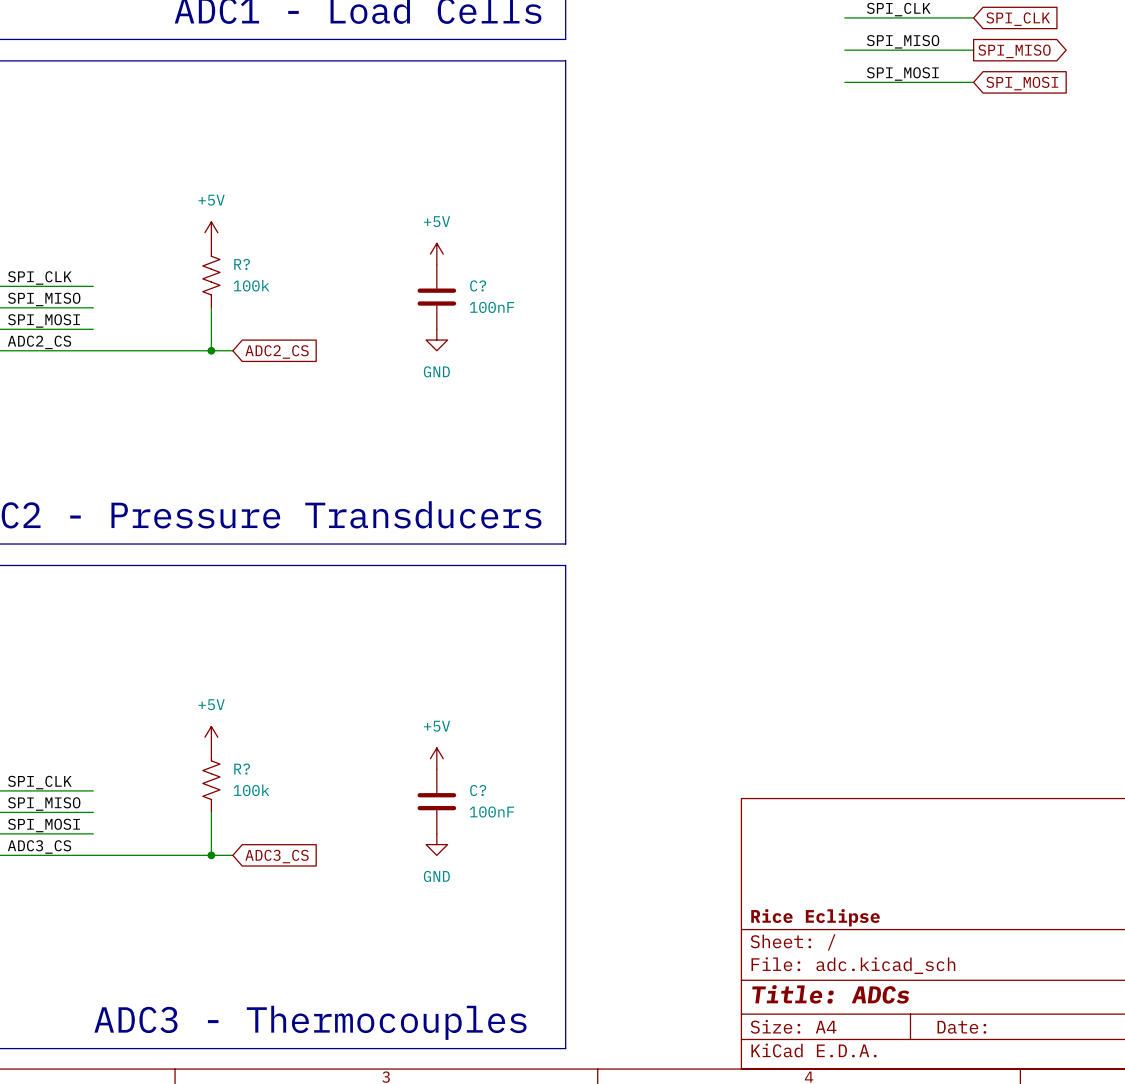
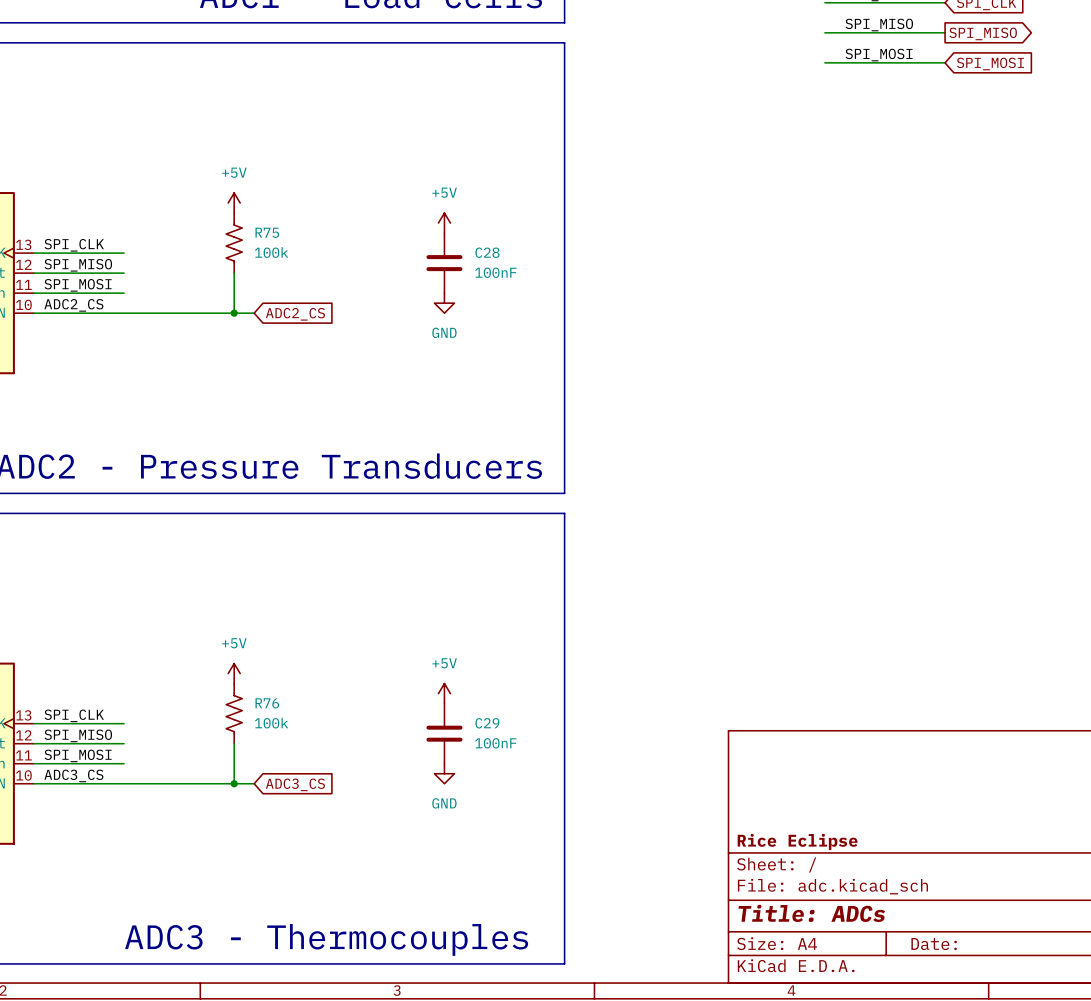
R? name: R? (242, 264) -> R75 (267, 232)
C? name: C? (478, 285) -> C28 (487, 252)
R? name: R? (242, 769) -> R76 (267, 703)
C? name: C? (478, 790) -> C29 (487, 723)

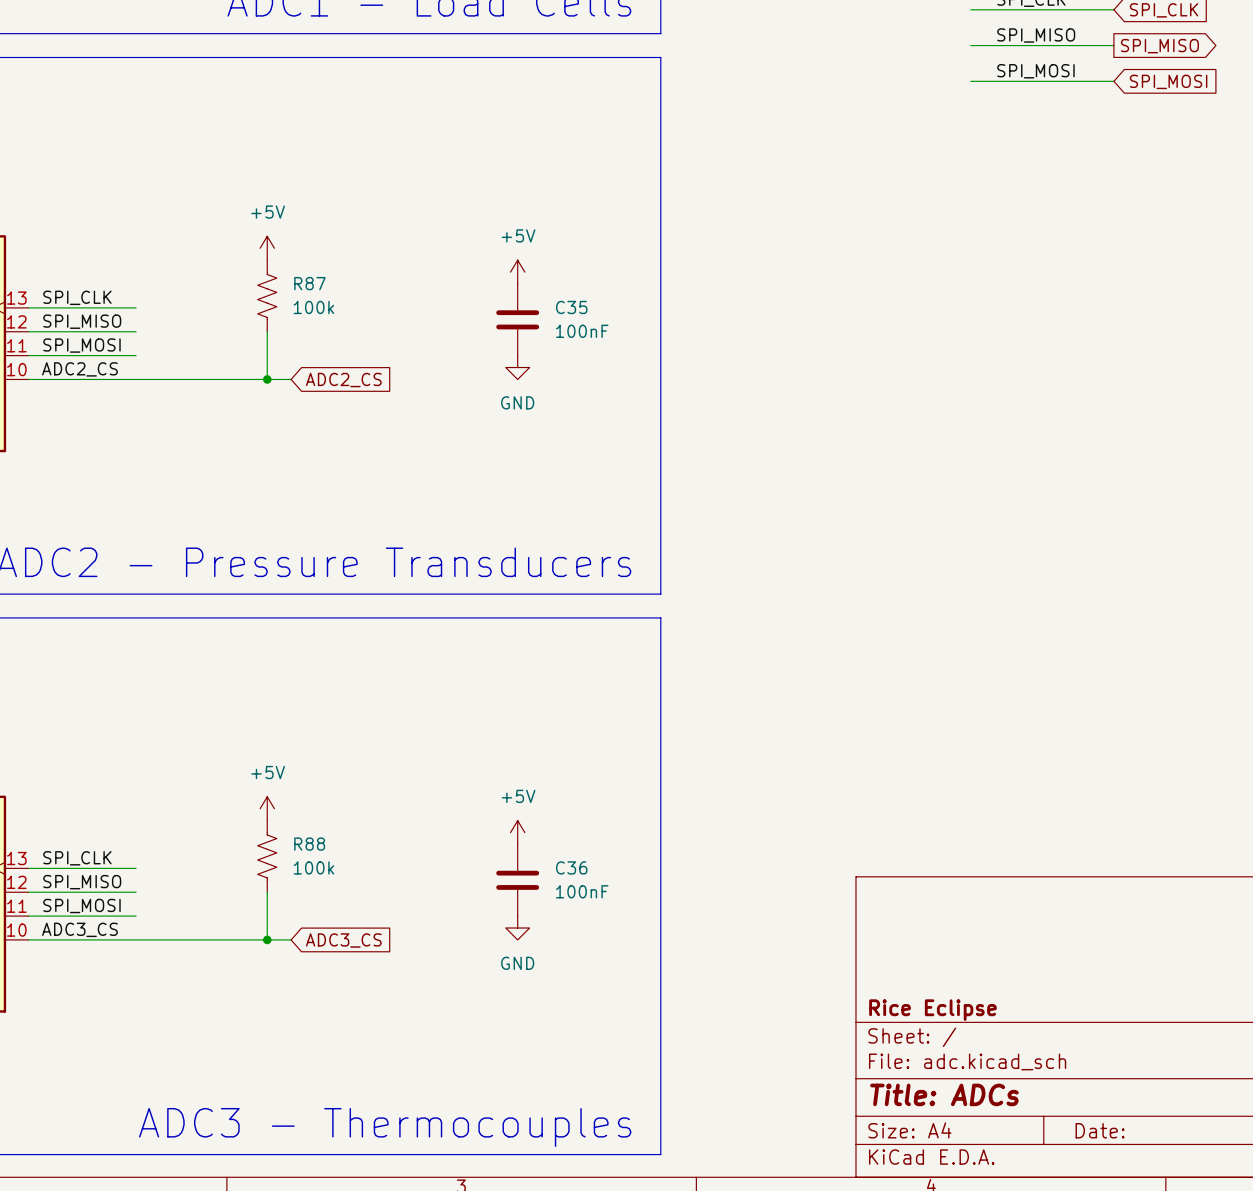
R75 name: R75 (267, 232) -> R87 (309, 283)
C28 name: C28 (487, 252) -> C35 (571, 307)
R76 name: R76 (267, 703) -> R88 (309, 844)
C29 name: C29 (487, 723) -> C36 (571, 867)

